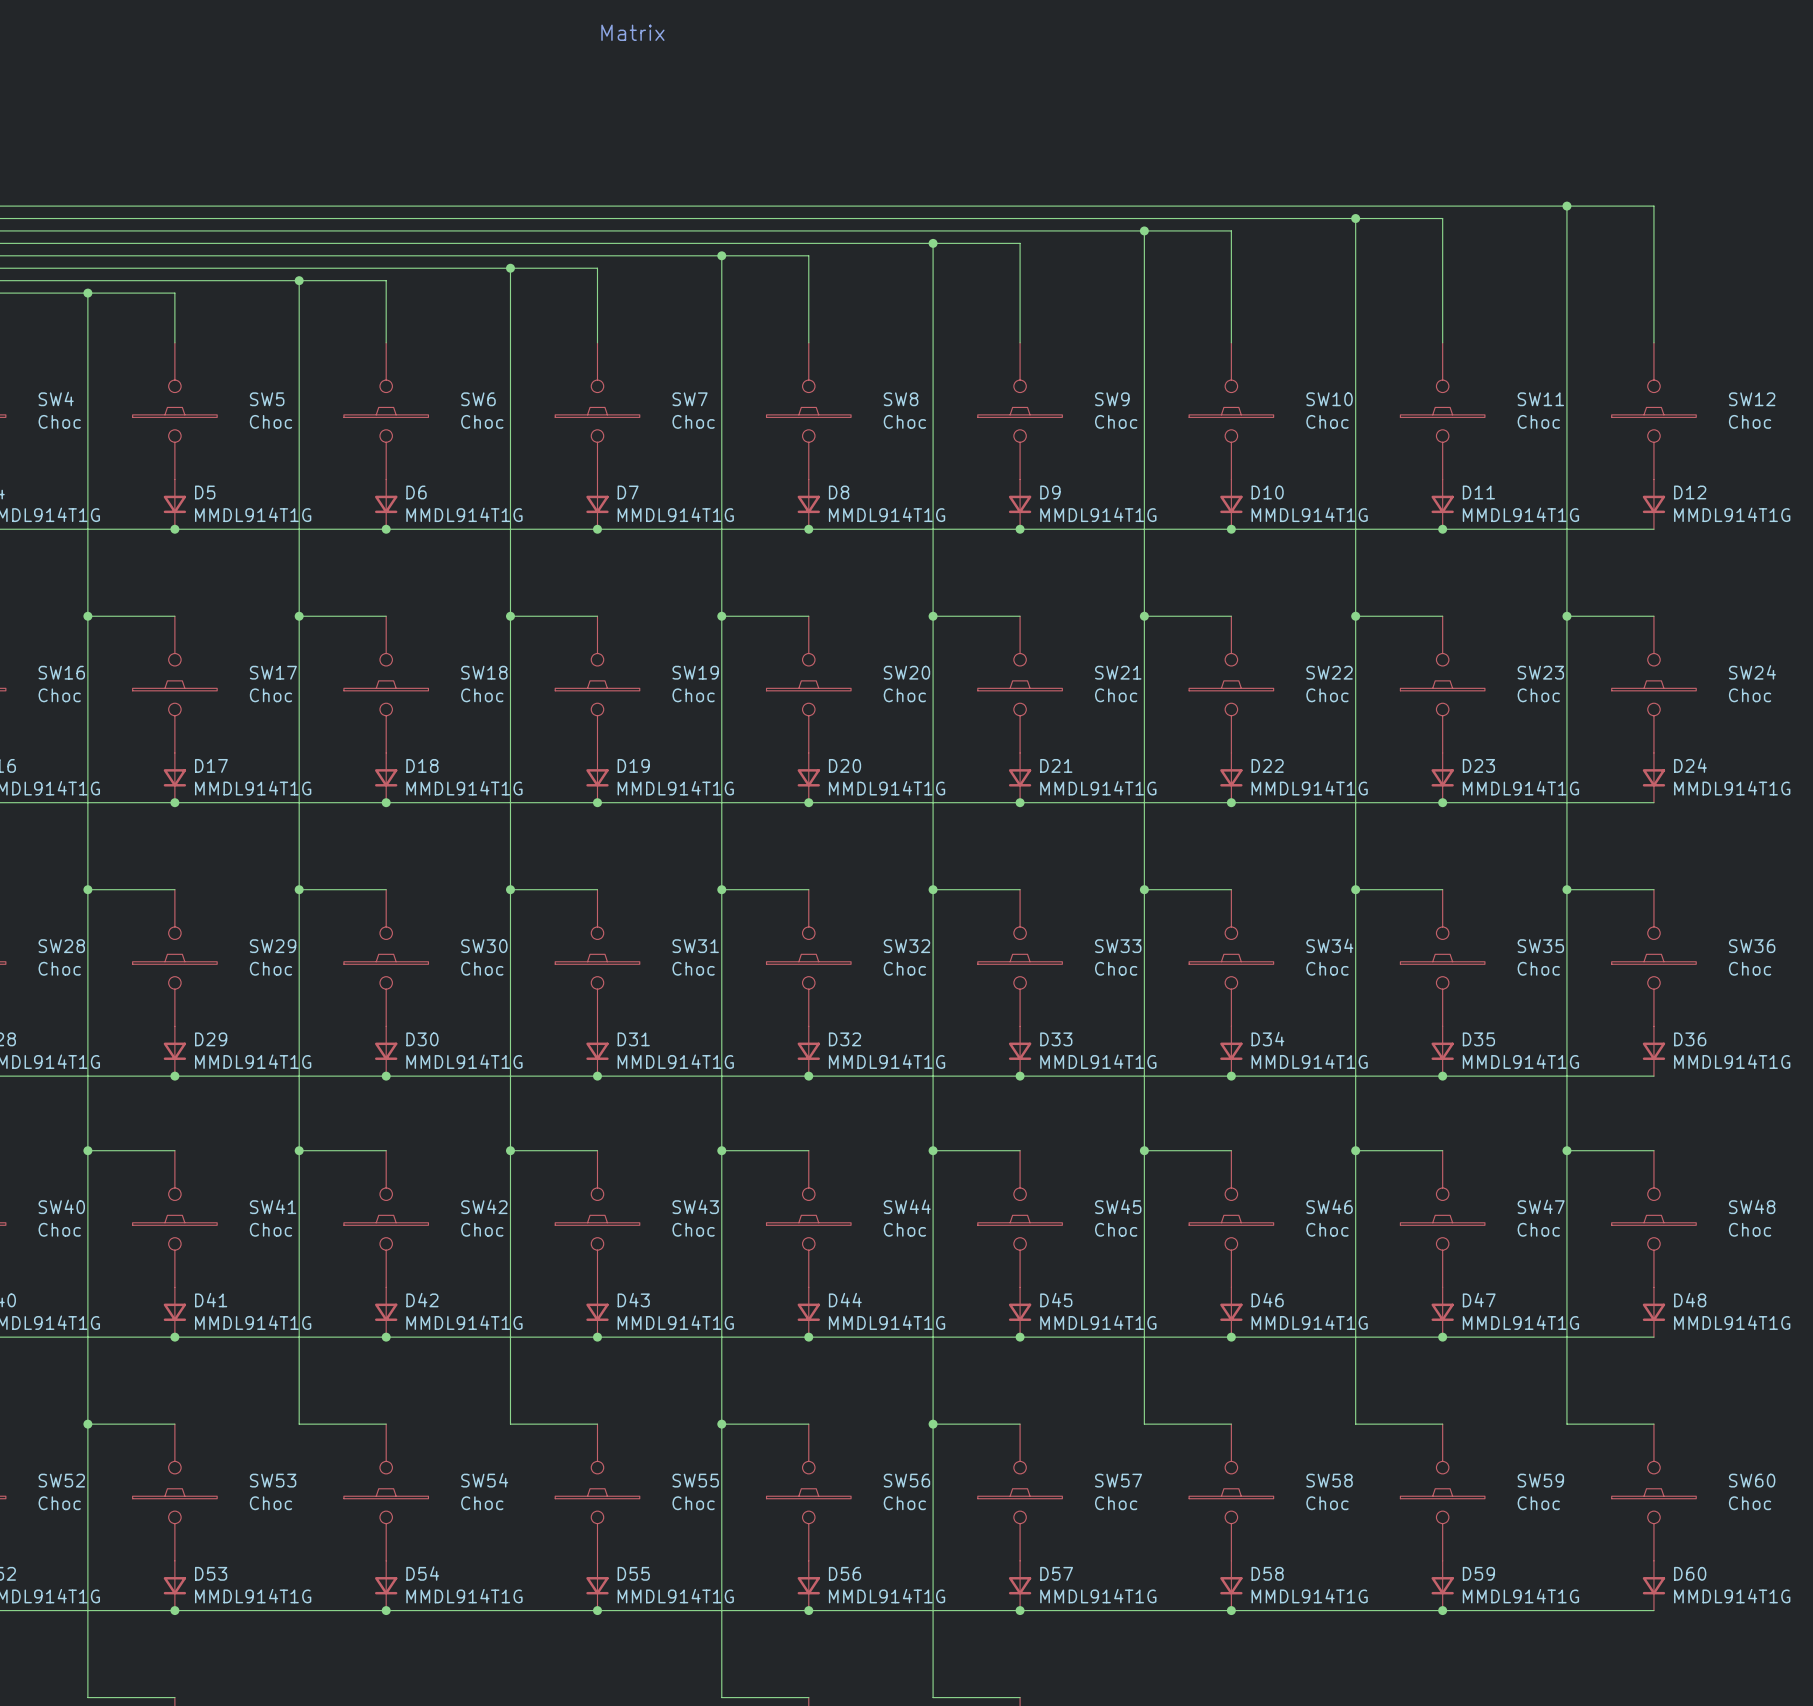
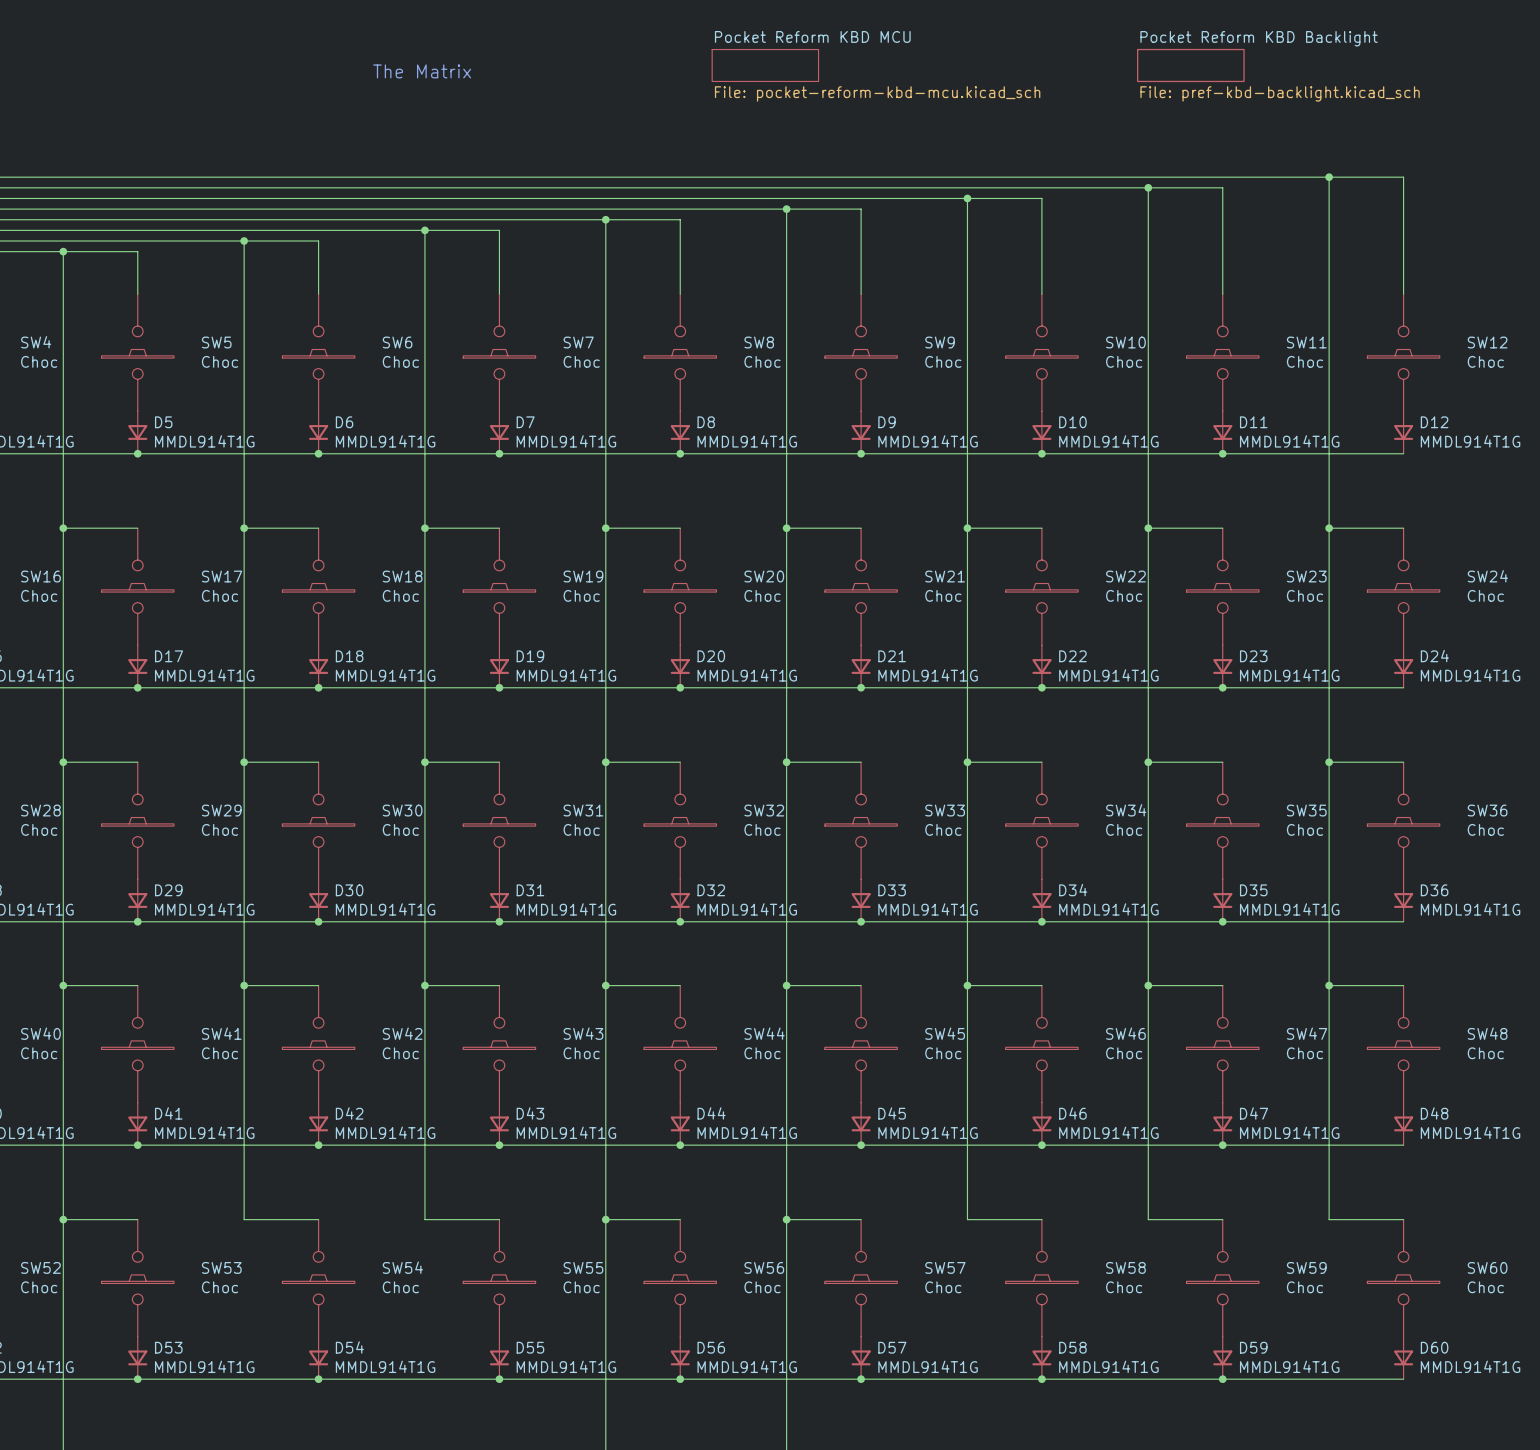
text: Matrix (632, 32) -> none
sheet Pocket Reform KBD MCU: none -> File: pocket-reform-kbd-mcu.kicad_sch (765, 65)
sheet Pocket Reform KBD Backlight: none -> File: pref-kbd-backlight.kicad_sch (1190, 65)
text: none -> The Matrix (422, 71)

